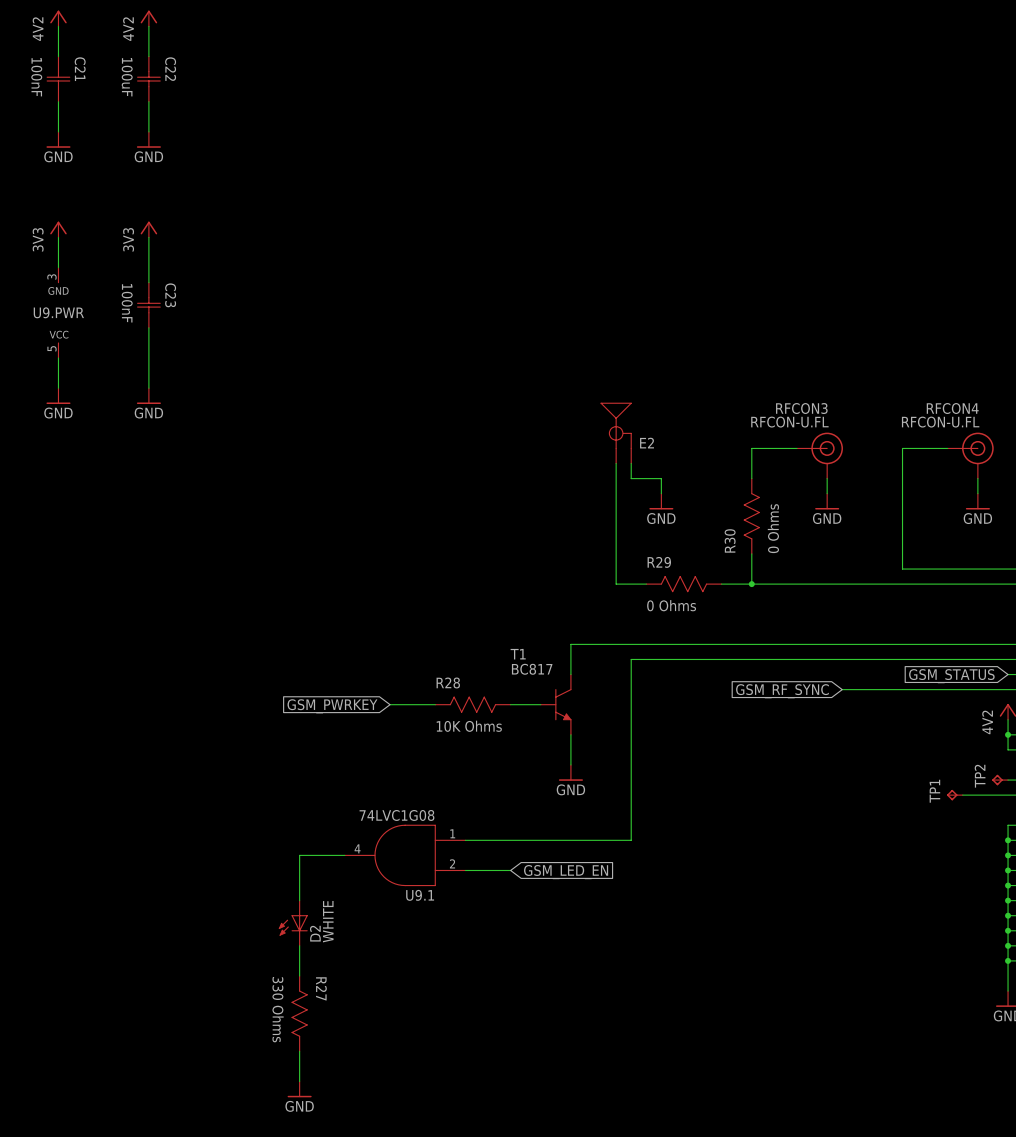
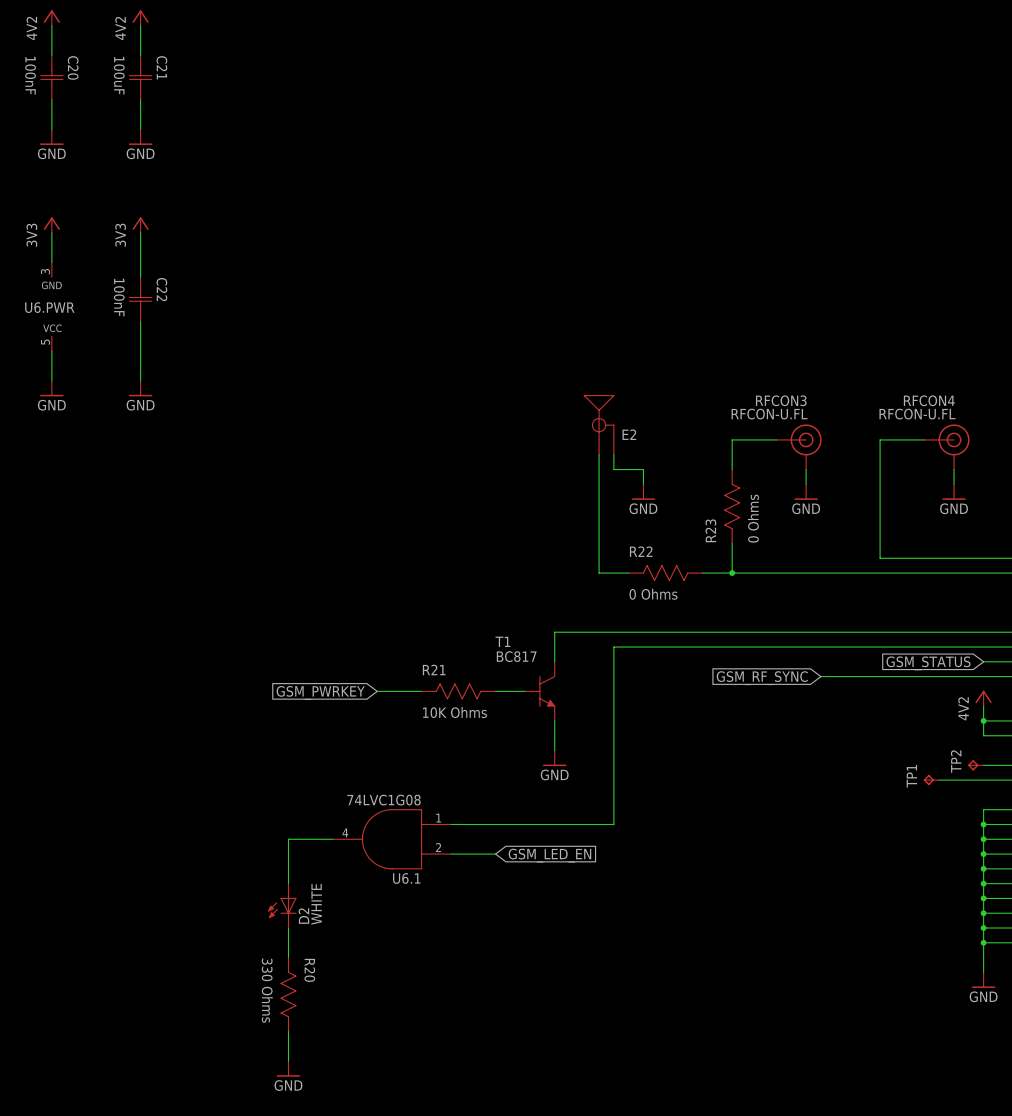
C21 name: C21 (80, 69) -> C20 (73, 67)
C22 name: C22 (170, 69) -> C21 (161, 67)
C23 name: C23 (170, 295) -> C22 (161, 289)
U9.PWR name: U9.PWR (58, 312) -> U6.PWR (49, 307)
R30 name: R30 (730, 540) -> R23 (710, 530)
R29 name: R29 (659, 562) -> R22 (641, 551)
R28 name: R28 (448, 682) -> R21 (434, 669)
U9.1 name: U9.1 (420, 895) -> U6.1 (406, 878)
R27 name: R27 (321, 988) -> R20 (309, 970)

